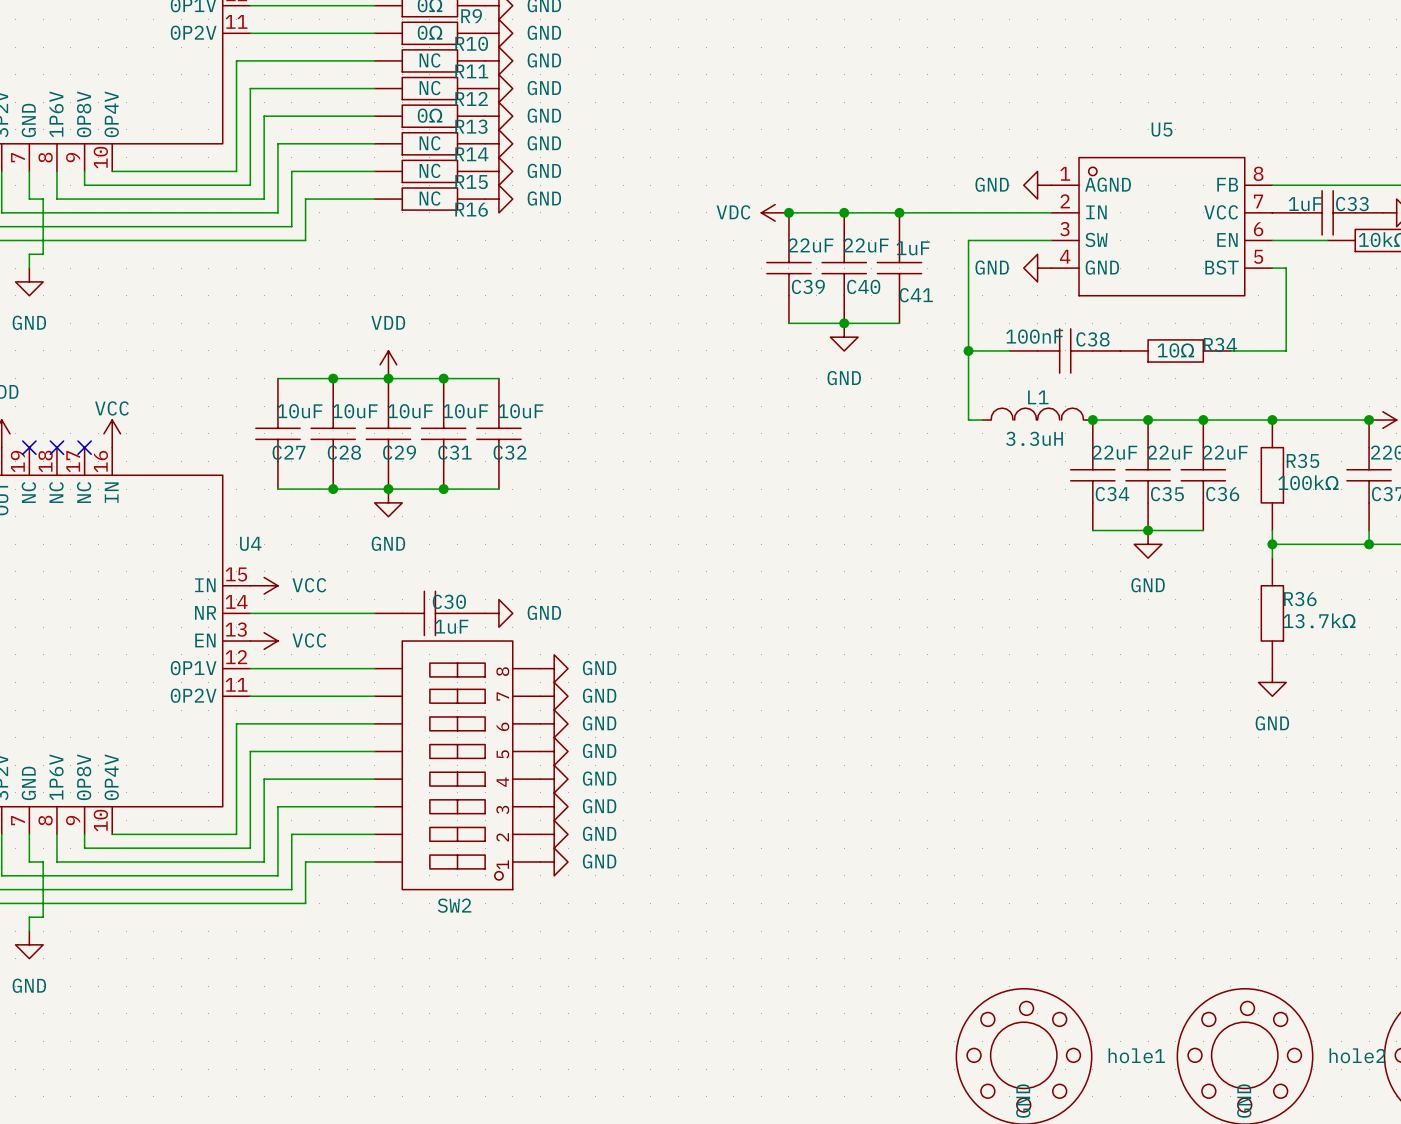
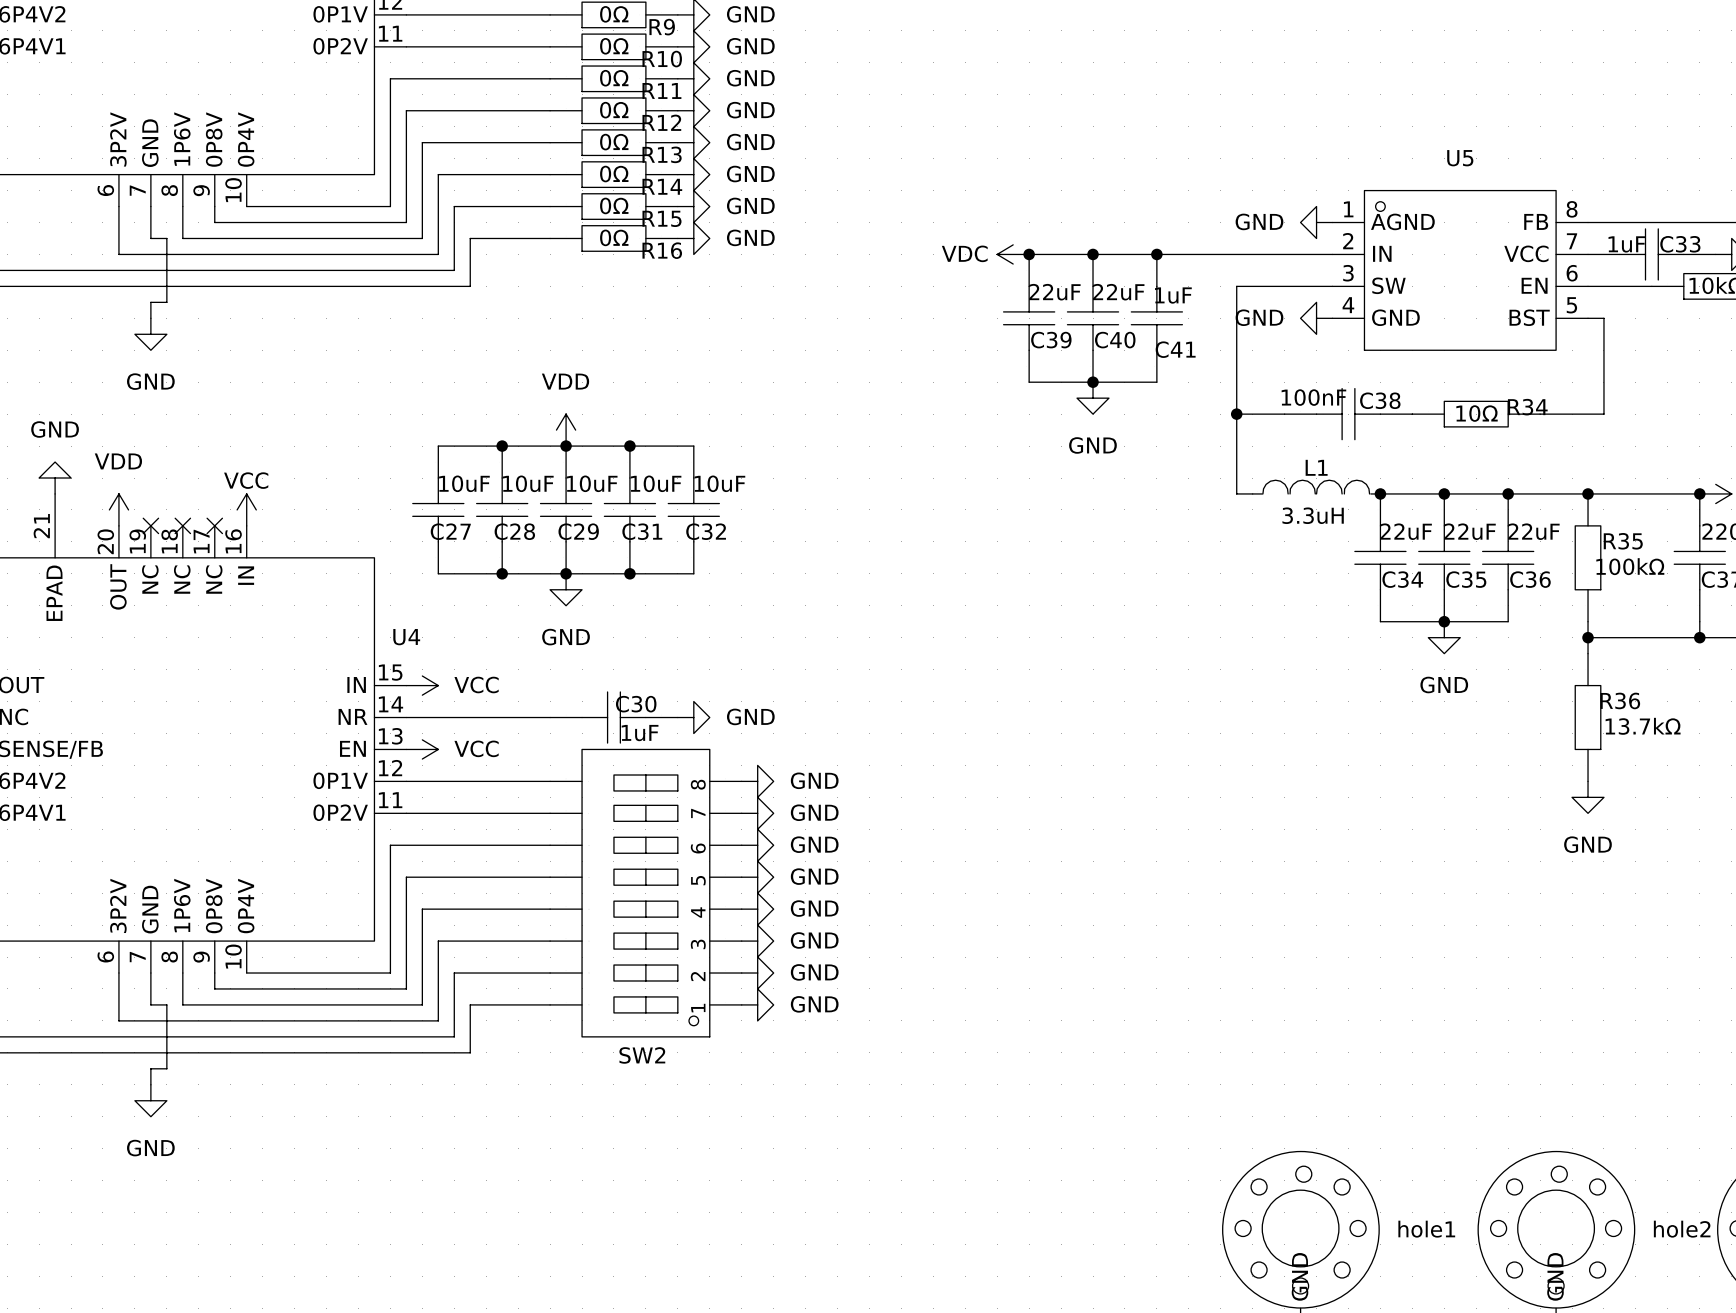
R11 value: NC (430, 60) -> 0Ω (614, 78)
R12 value: NC (430, 88) -> 0Ω (614, 110)
R14 value: NC (430, 143) -> 0Ω (614, 174)
R15 value: NC (430, 170) -> 0Ω (614, 205)
R16 value: NC (430, 198) -> 0Ω (614, 237)

